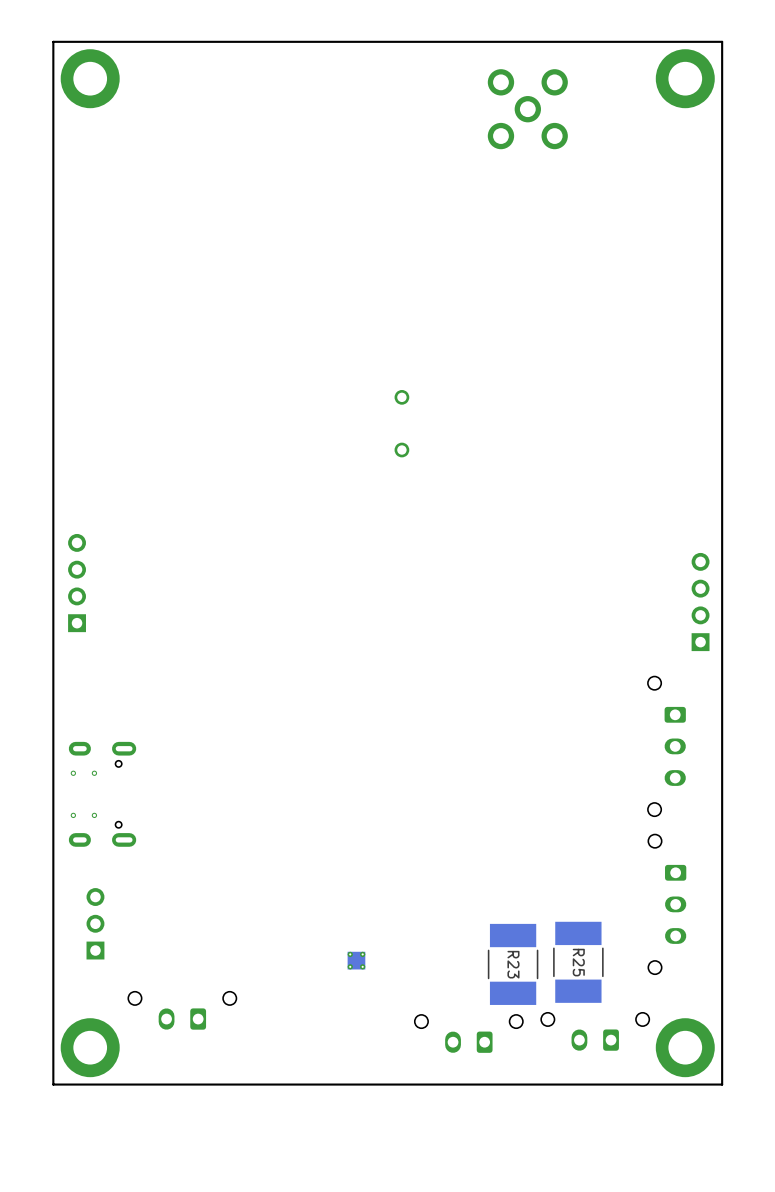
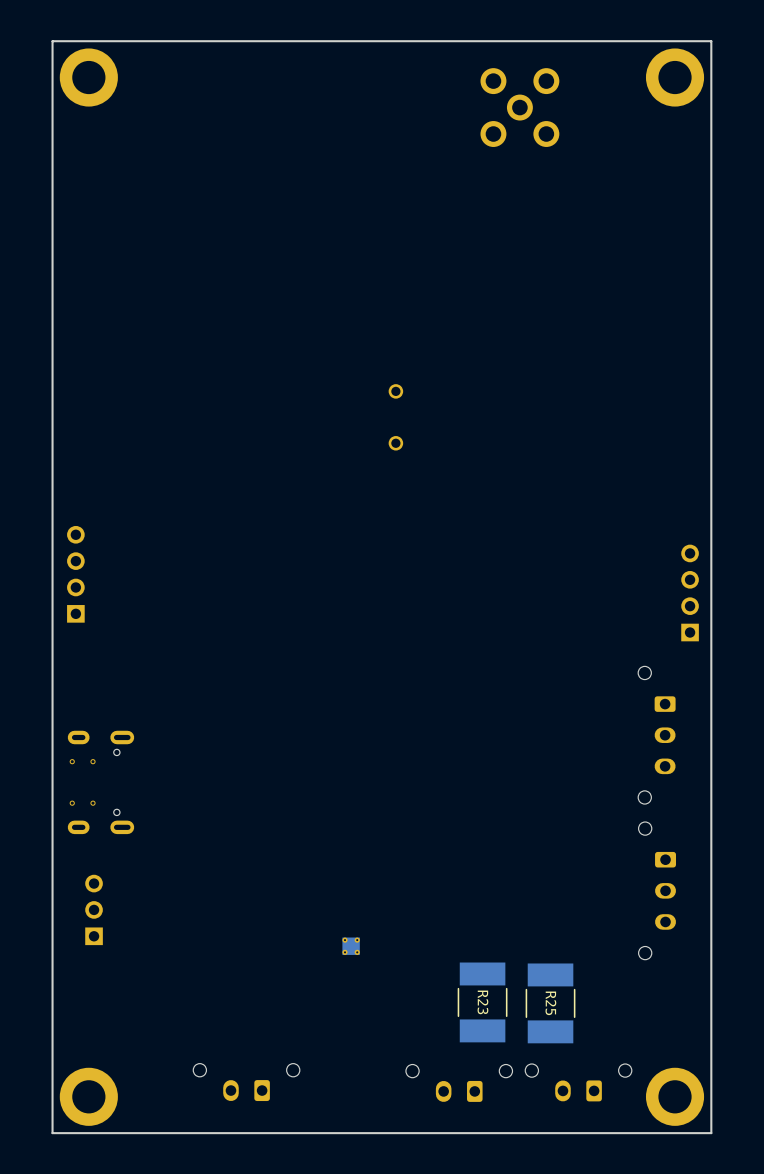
R25 position: (578, 962) -> (550, 1003)
R23 position: (513, 964) -> (482, 1002)
part position: (182, 1010) -> (246, 1082)
part: (595, 1031) -> none
part position: (468, 1033) -> (459, 1083)
part position: (90, 1047) -> (88, 1096)
part position: (685, 1047) -> (675, 1096)
board edge: (722, 1084) (53, 1084) -> (711, 1068) (711, 1133) (52, 1133) (52, 1068)
part: none -> (578, 1082)

